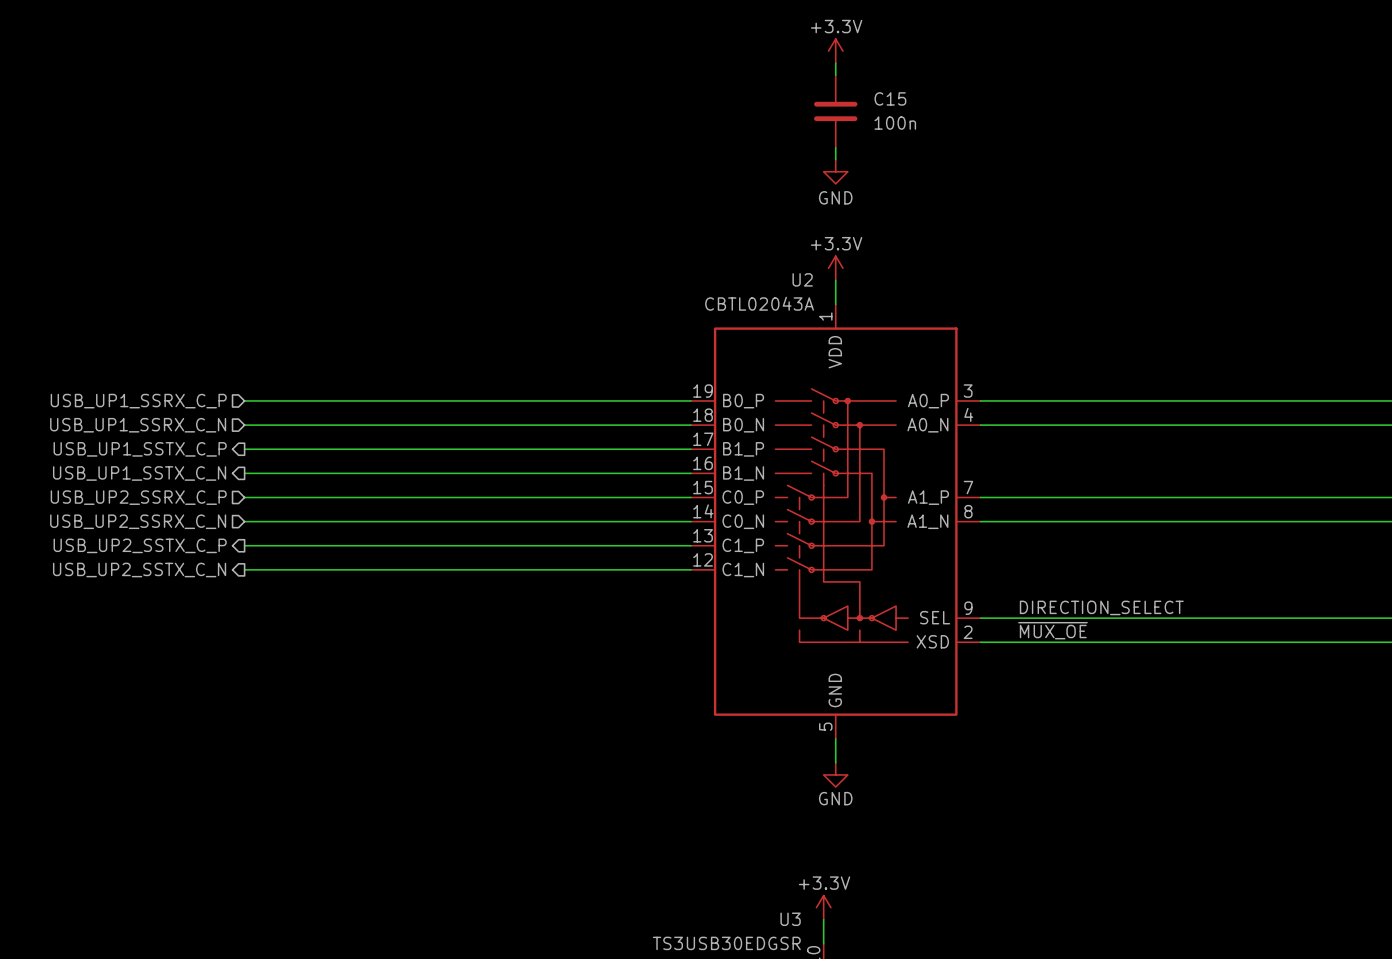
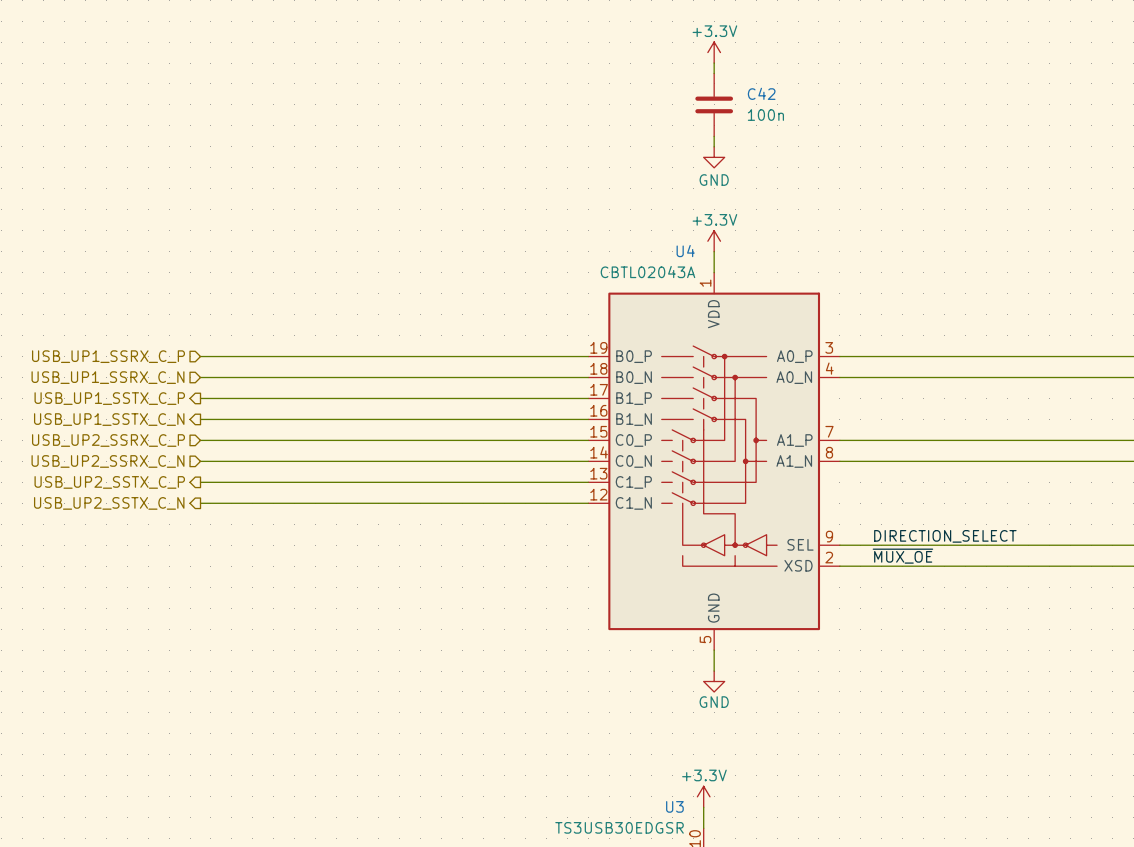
C15 name: C15 (890, 98) -> C42 (761, 93)
U2 name: U2 (802, 279) -> U4 (685, 251)

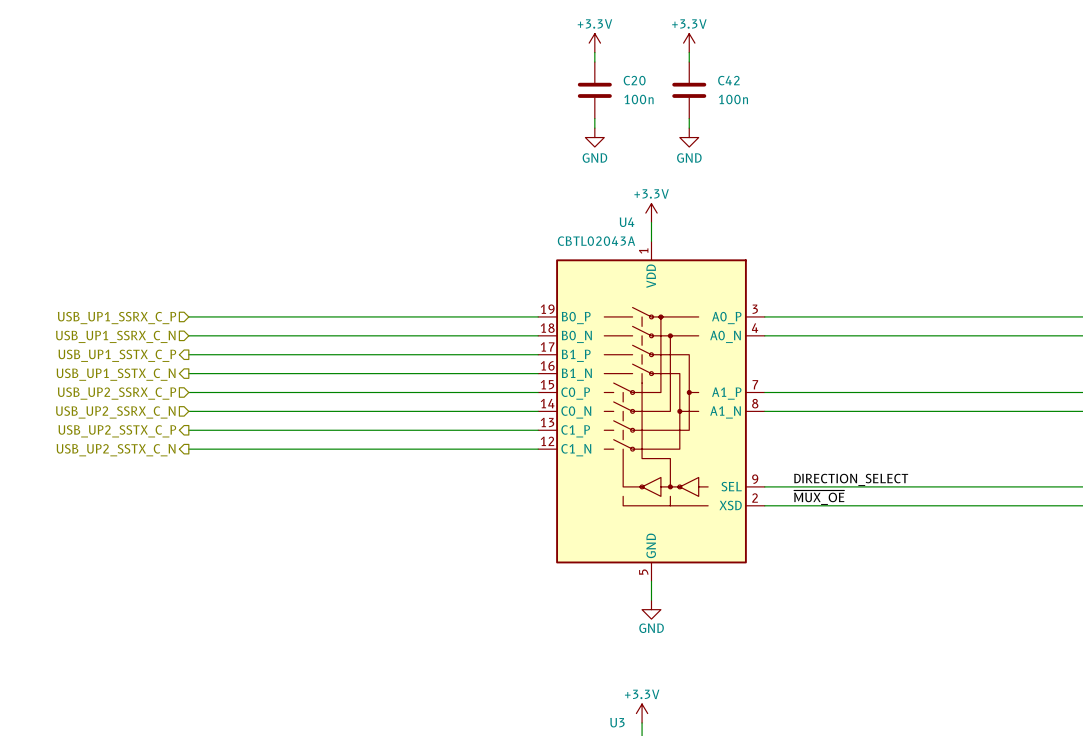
power symbol: none -> +3.3V (594, 43)
power symbol: +3.3V (714, 52) -> none
power symbol: none -> +3.3V (689, 43)
wire: none -> (594, 52) (594, 62)
wire: (714, 63) (714, 73) -> (689, 52) (689, 62)
C20: none -> 100n (594, 90)
C42 position: (714, 104) -> (689, 90)
wire: none -> (594, 118) (594, 128)
wire: (714, 136) (714, 146) -> (689, 118) (689, 128)
power symbol: none -> GND (594, 137)
power symbol: GND (714, 157) -> none
power symbol: none -> GND (689, 137)

